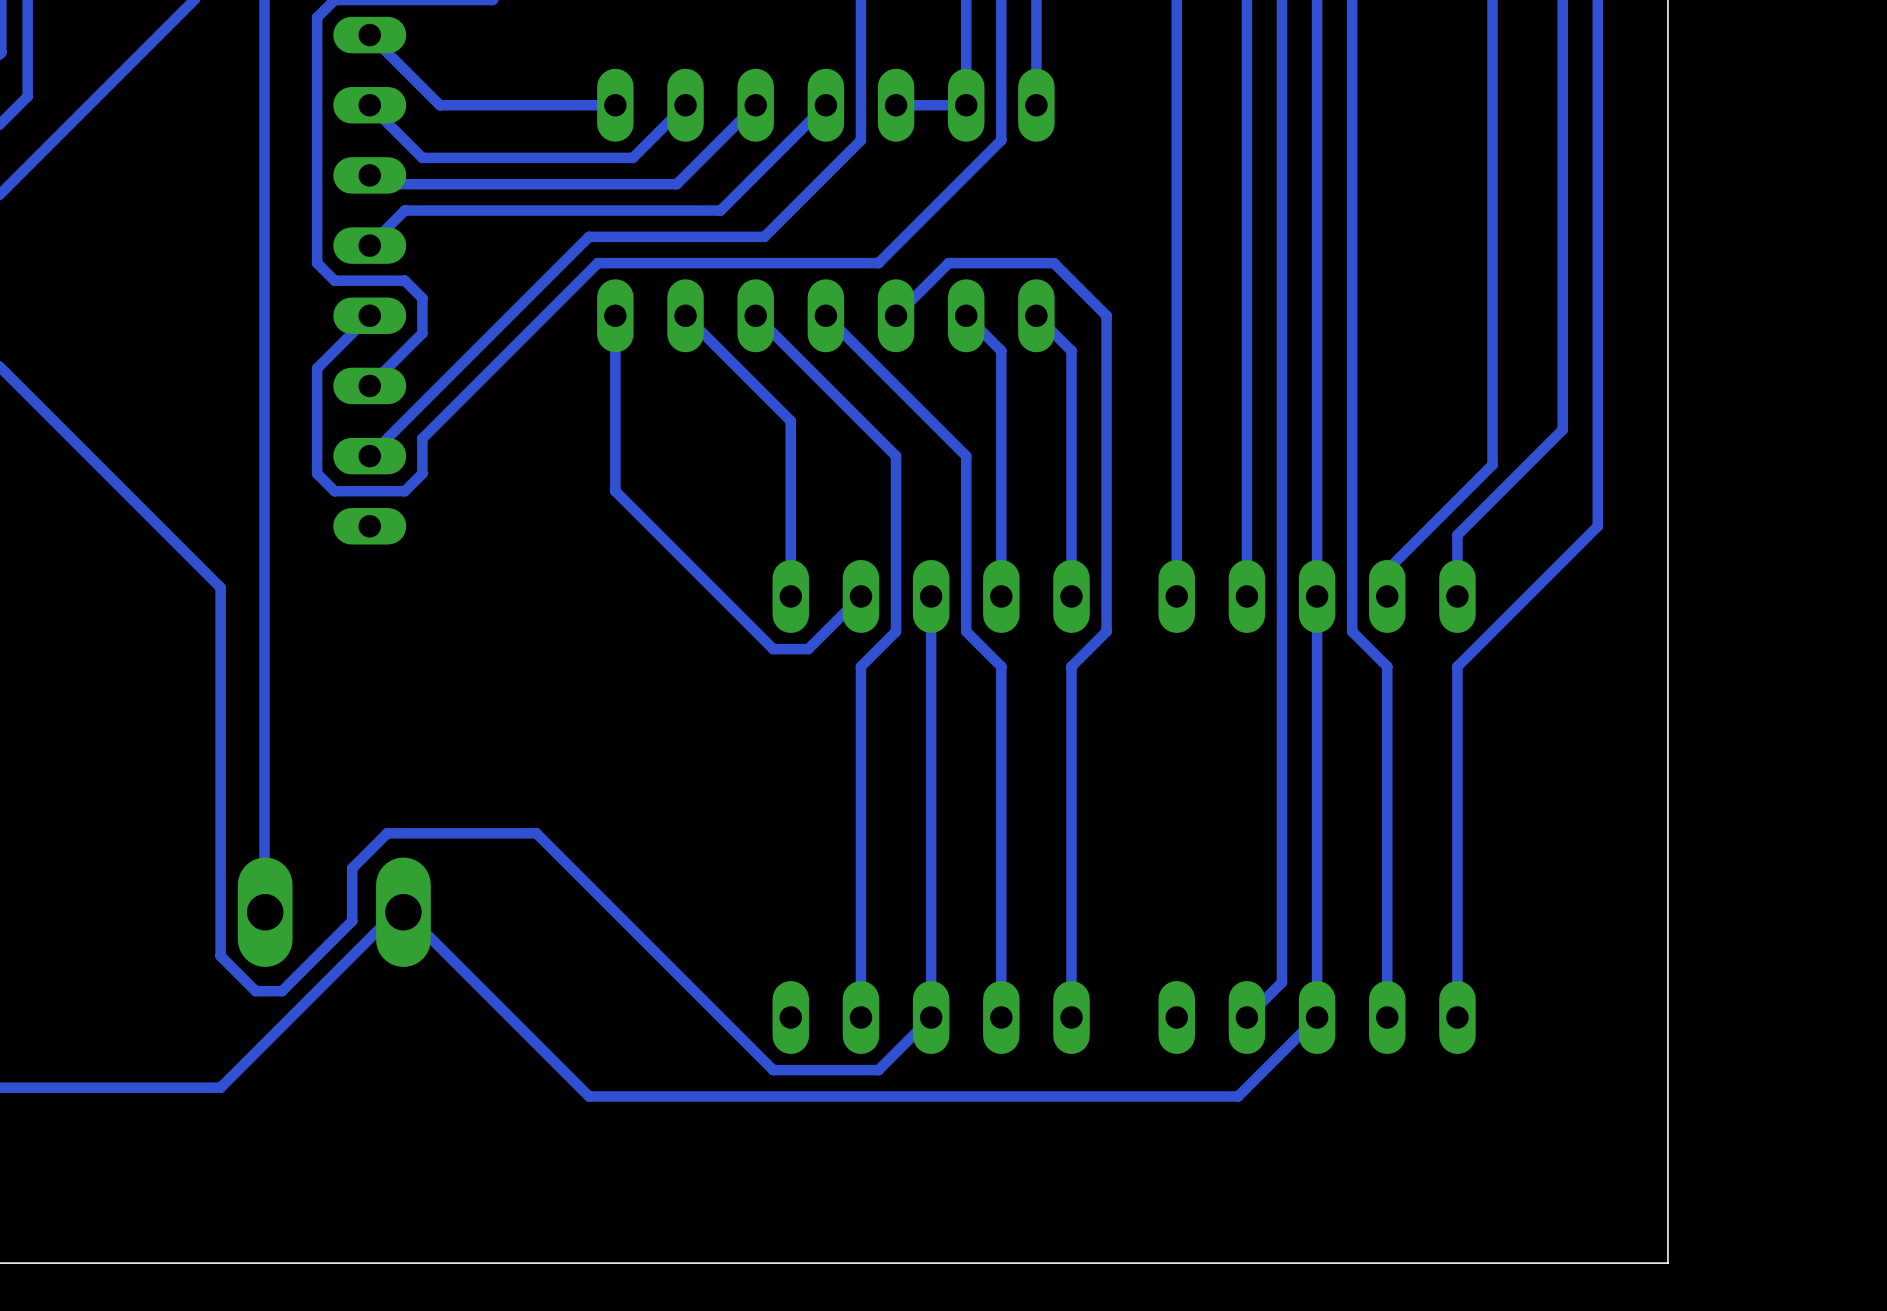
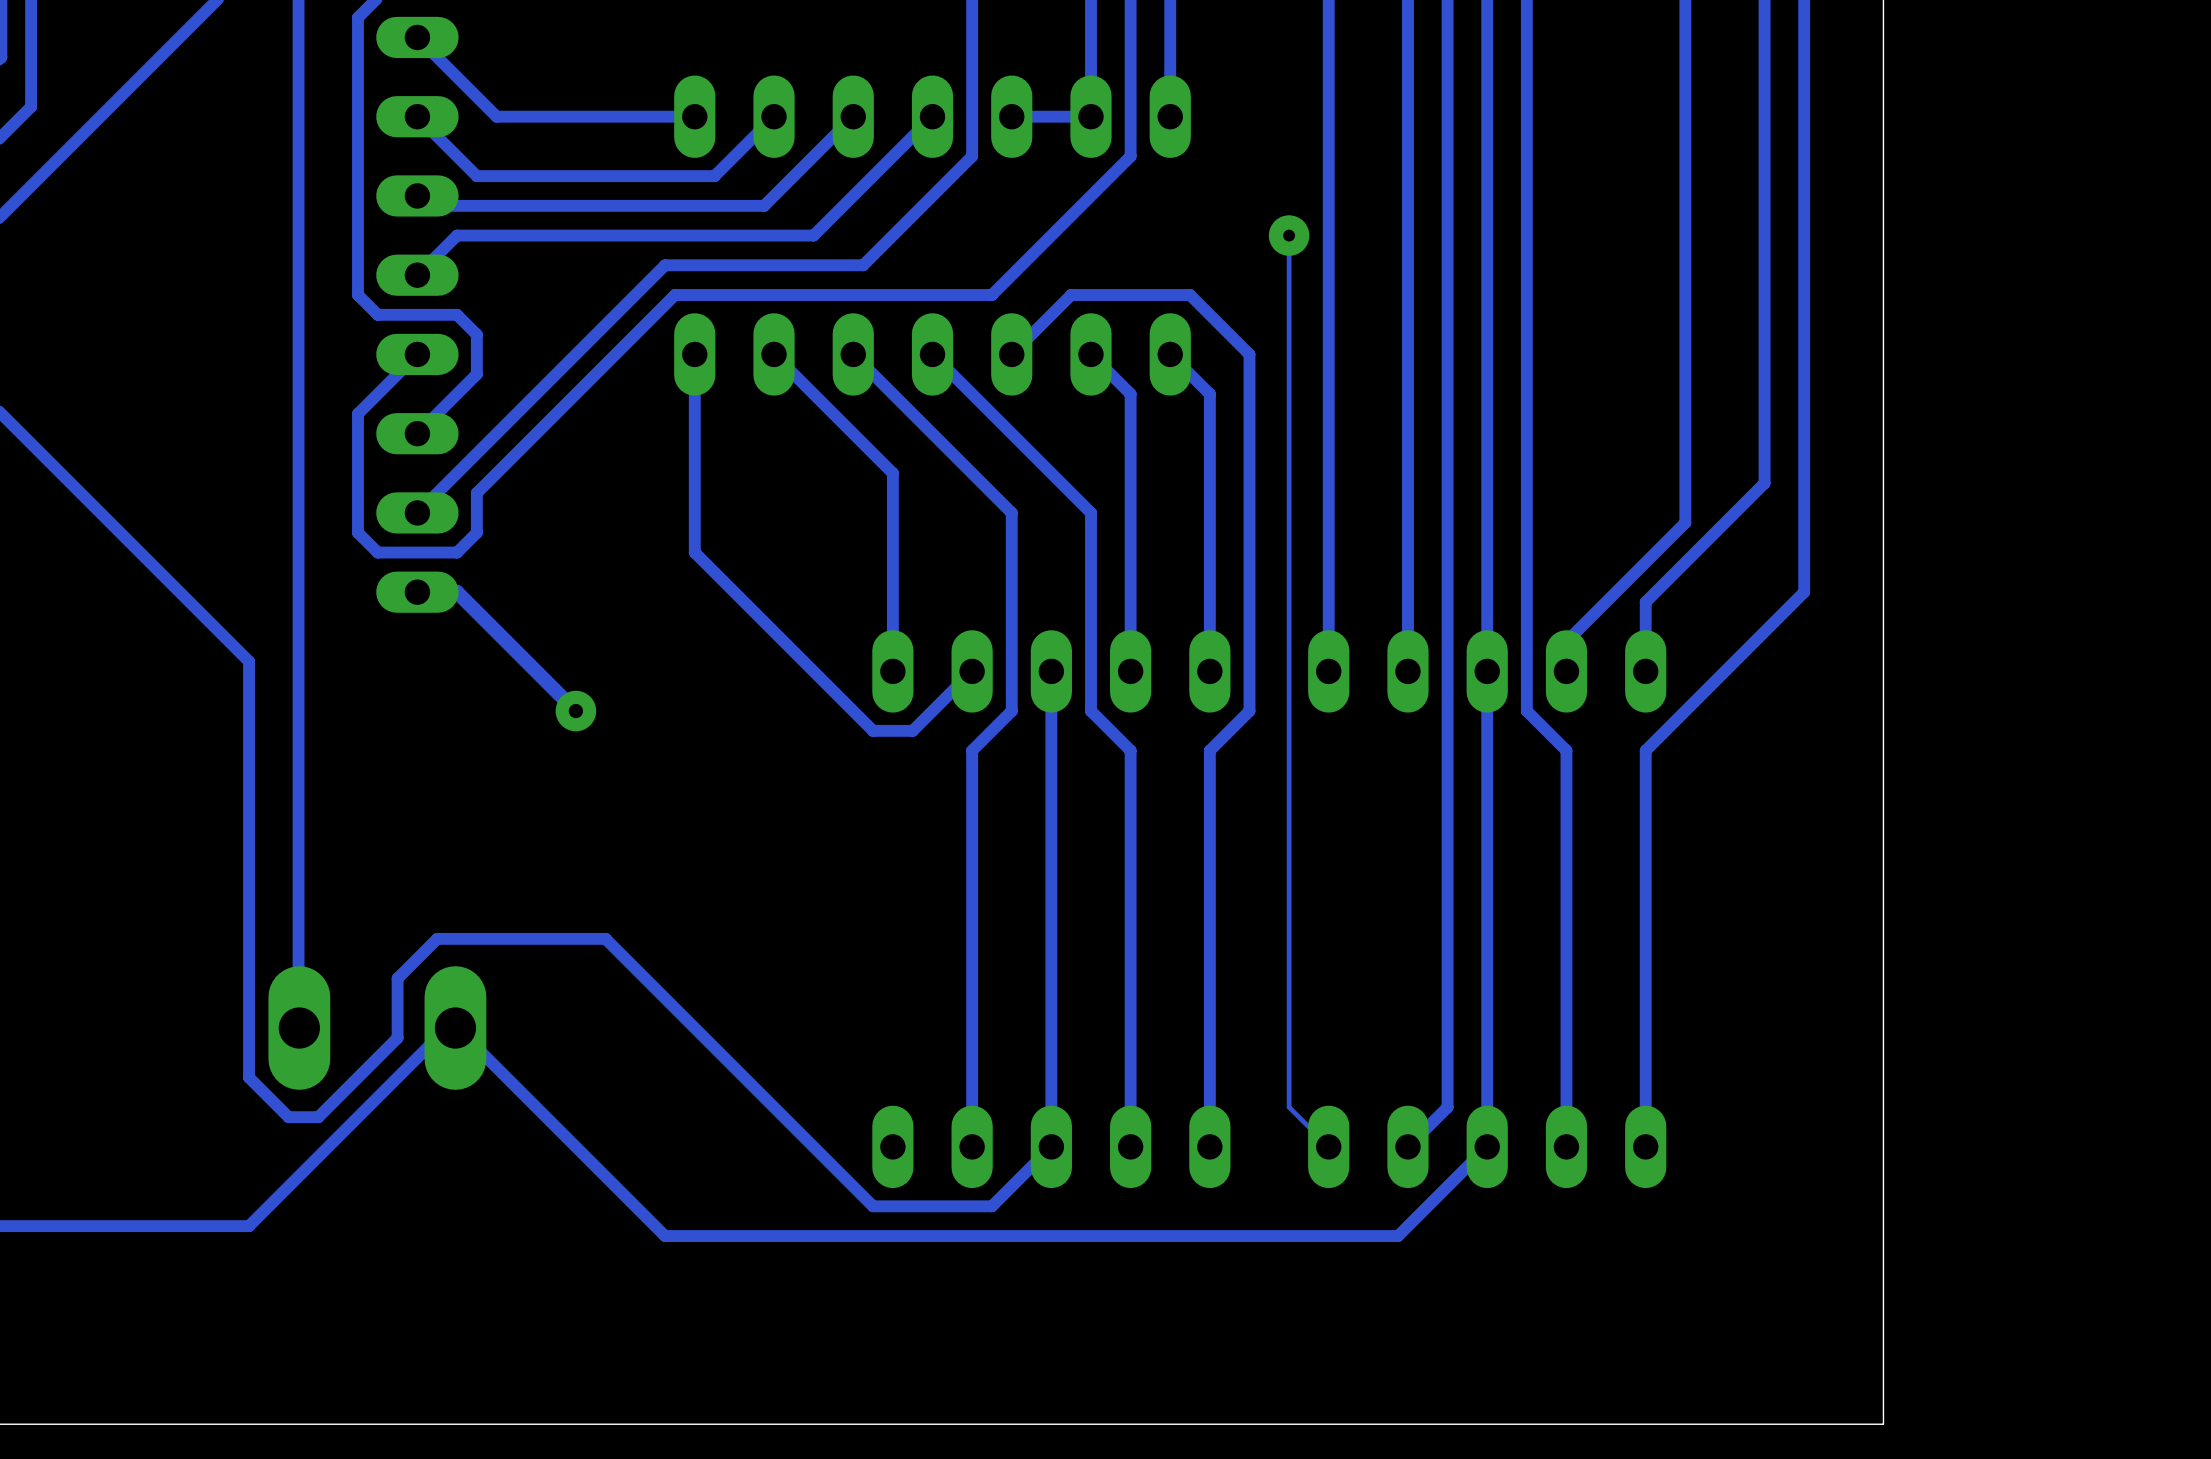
track: none -> (1289, 235) (1289, 1107) (1328, 1146)
via: none -> (1289, 235)
track: none -> (417, 592) (457, 592) (575, 711)
via: none -> (575, 711)

